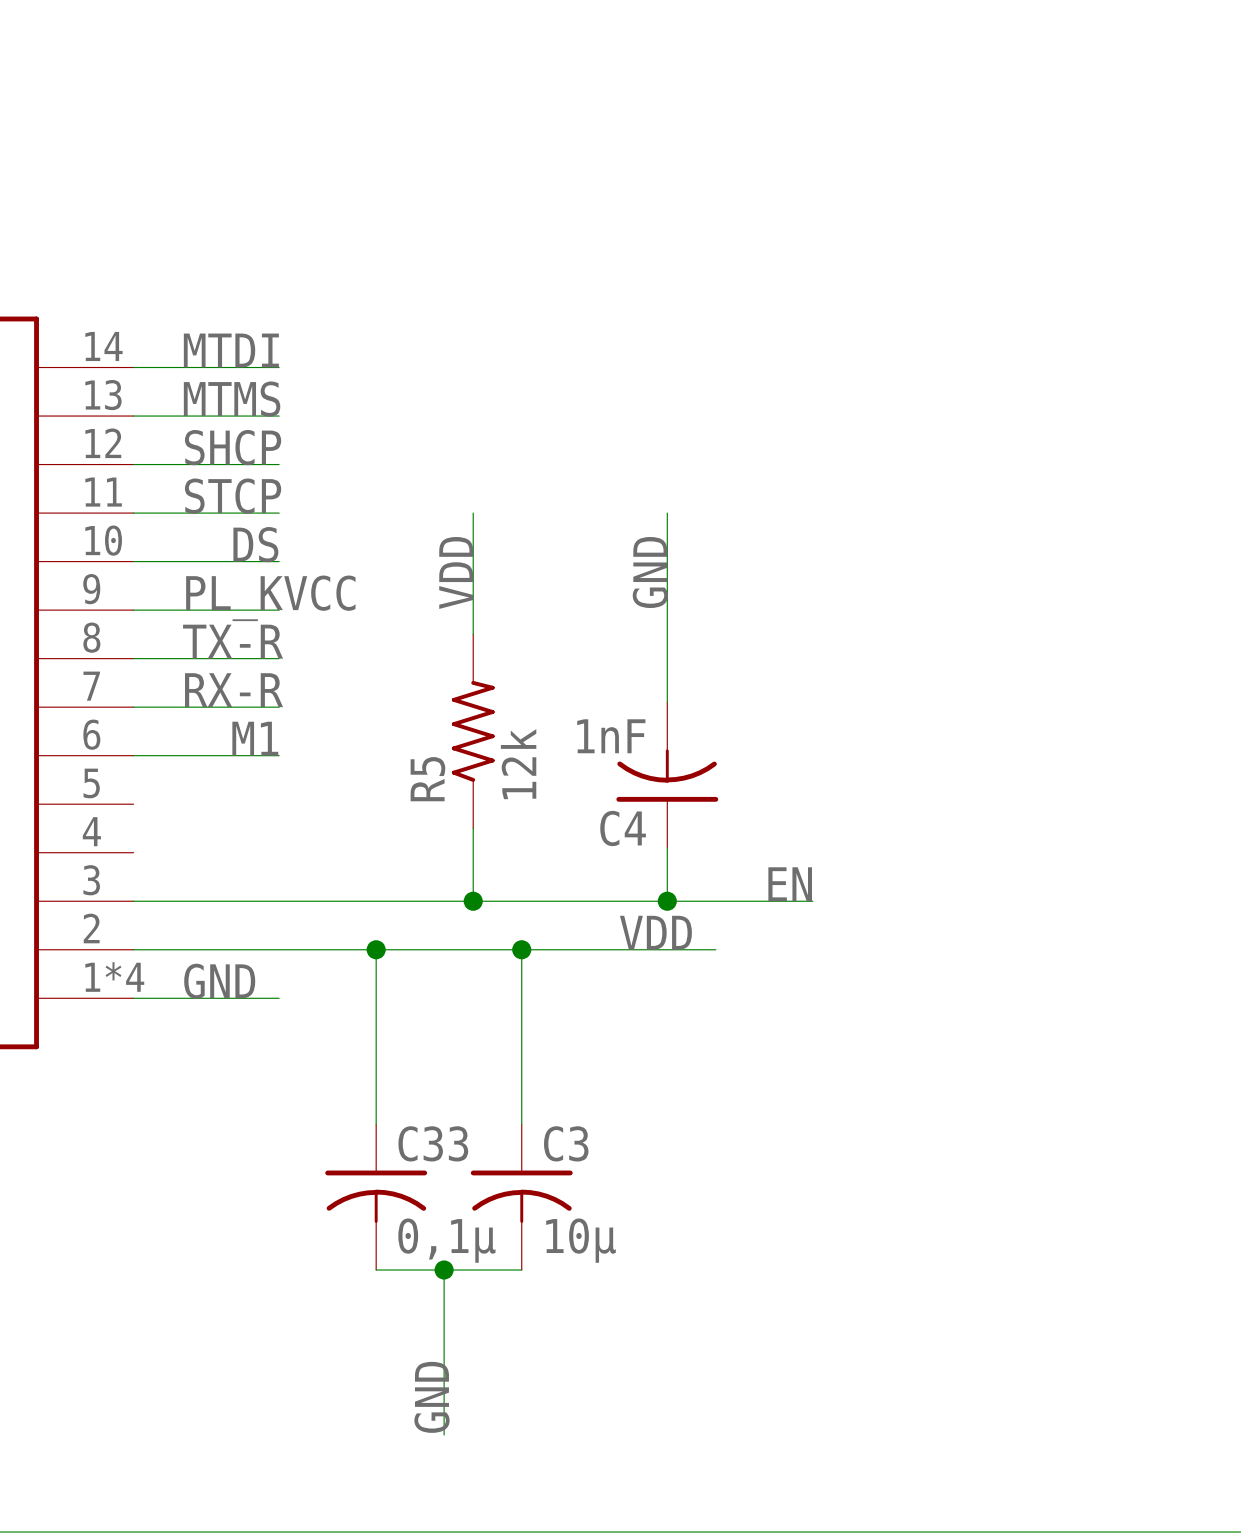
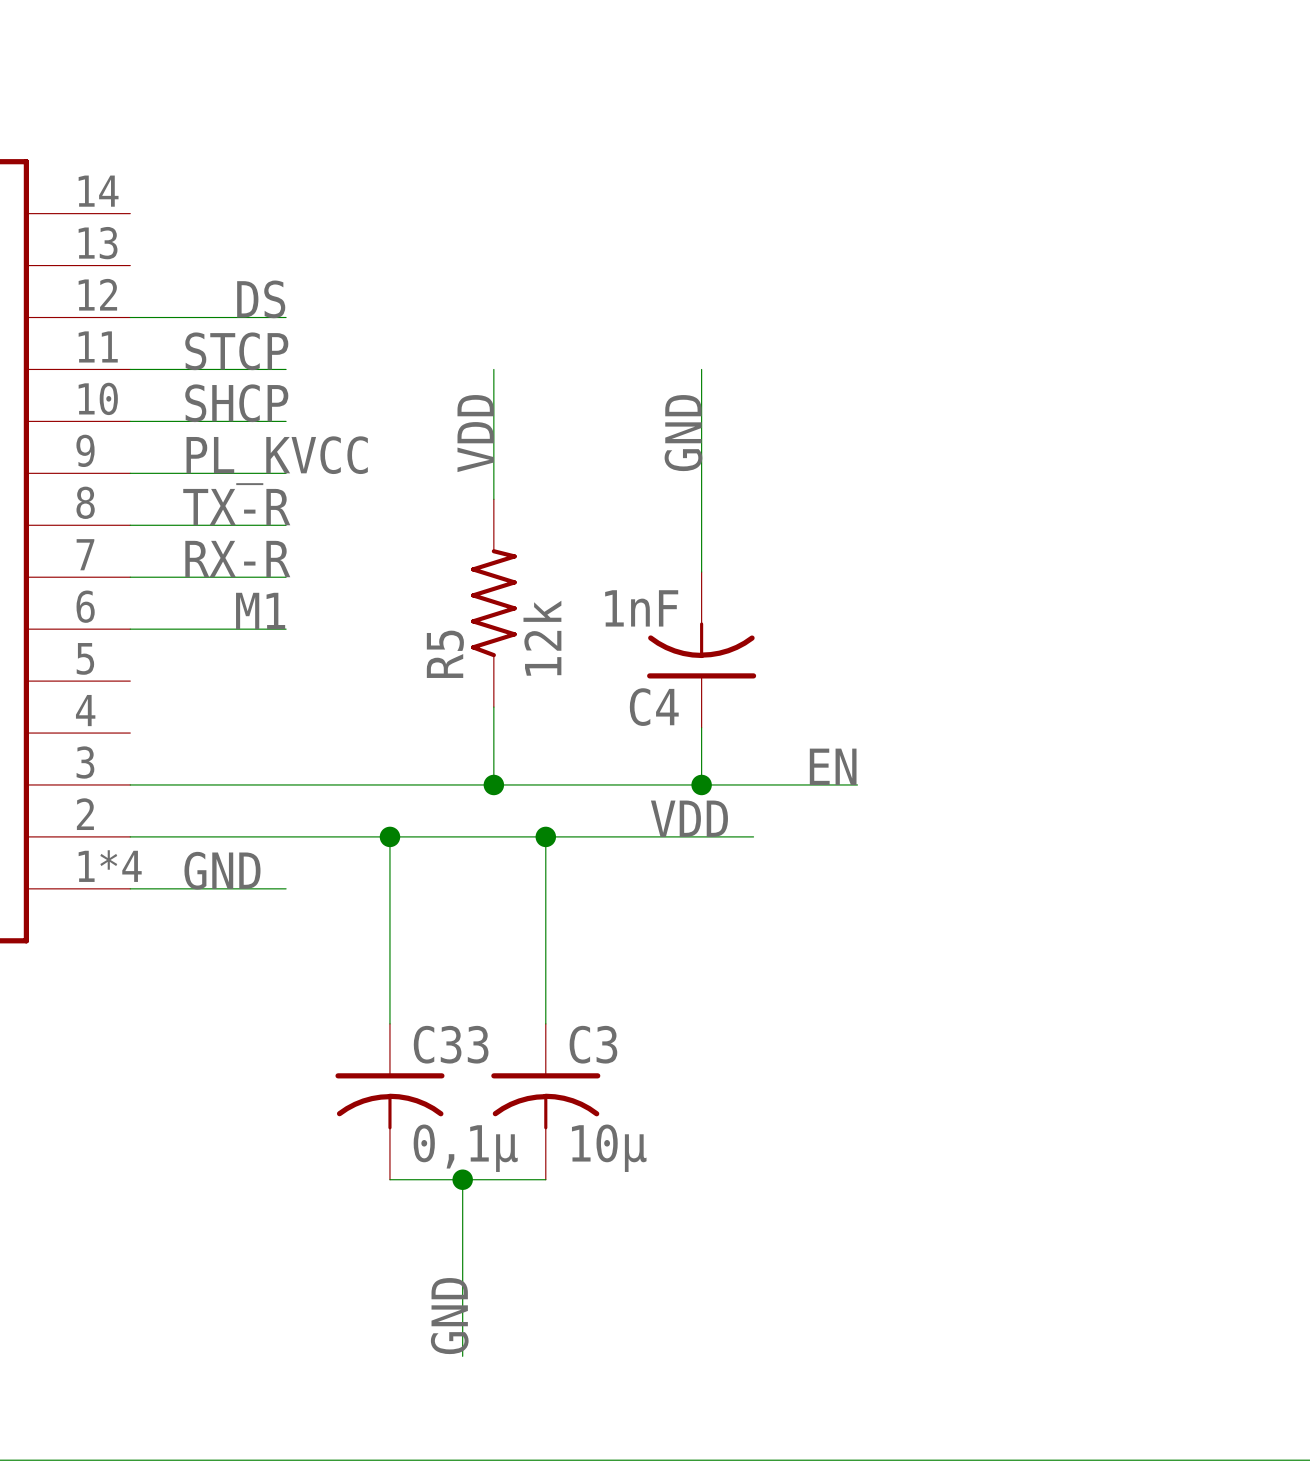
label: MTDI (231, 350) -> none
wire: (133, 367) (279, 367) -> none
label: MTMS (232, 399) -> none
wire: (133, 416) (279, 416) -> none
label position: SHCP (233, 447) -> SHCP (236, 403)
label position: DS (255, 544) -> DS (261, 299)

